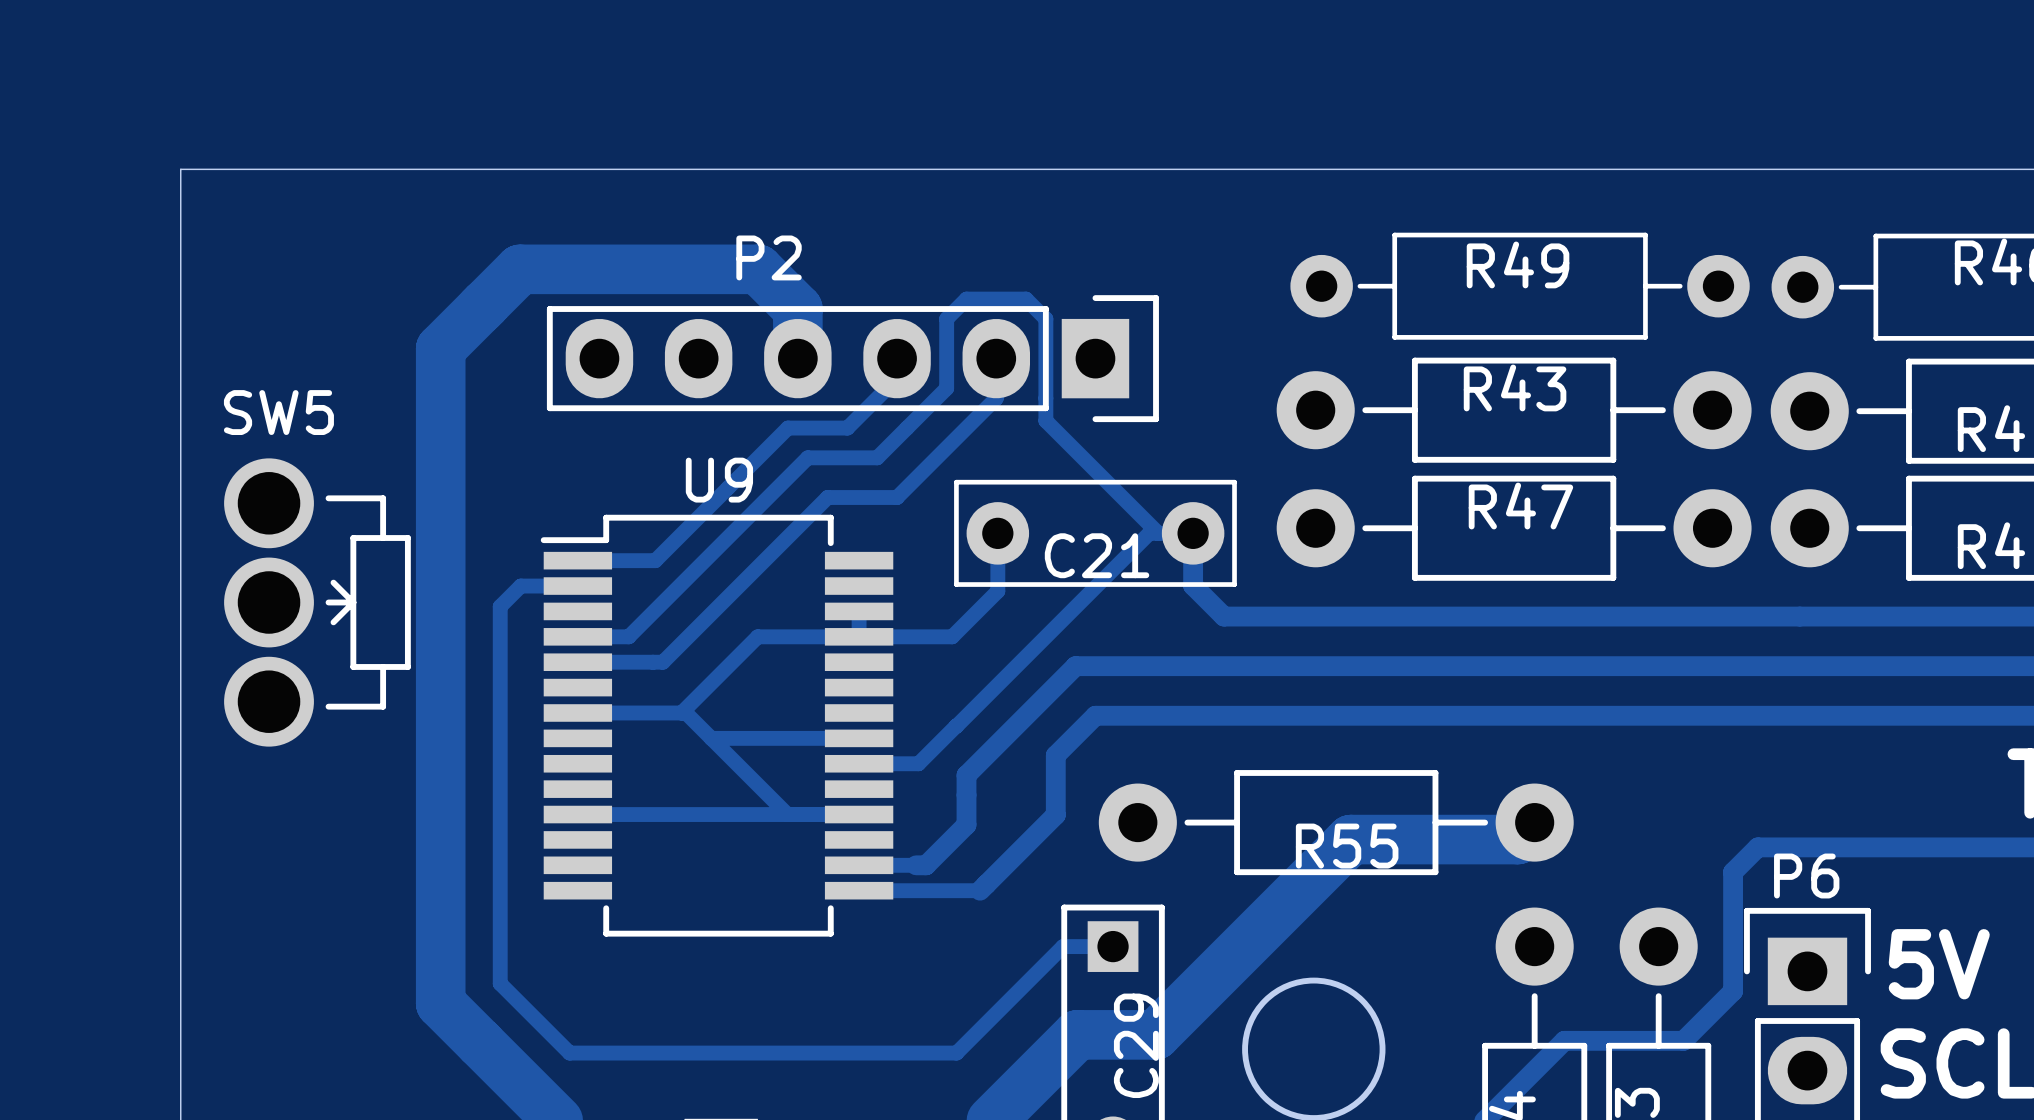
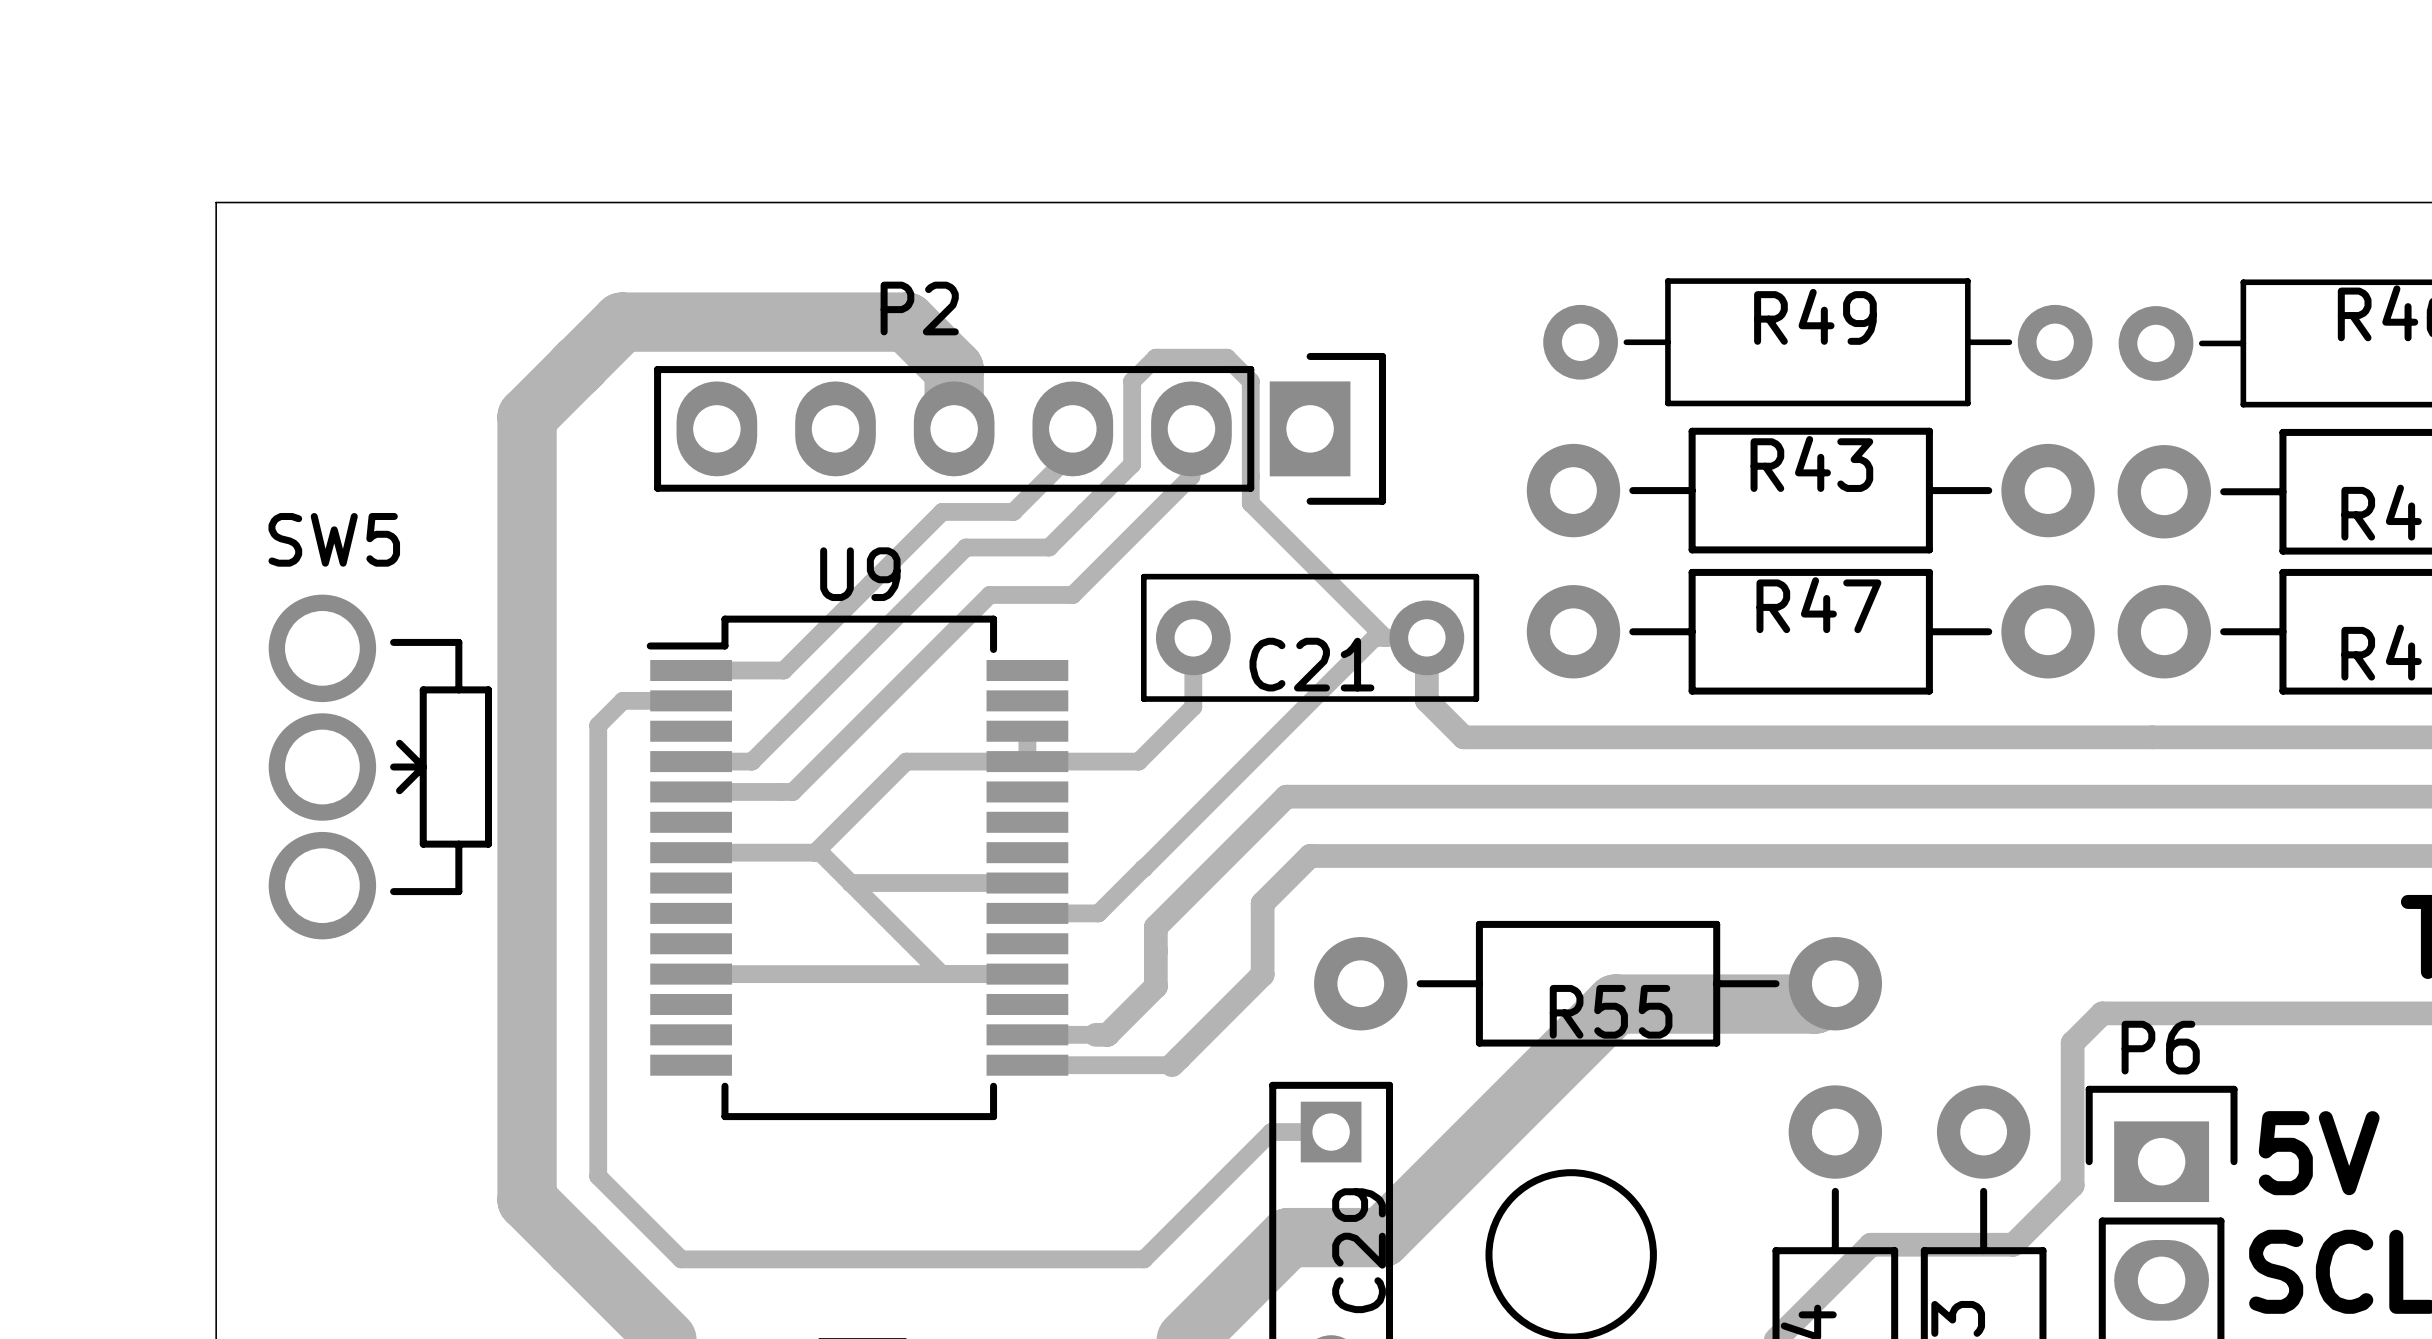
SW5 position: (317, 602) -> (380, 767)

